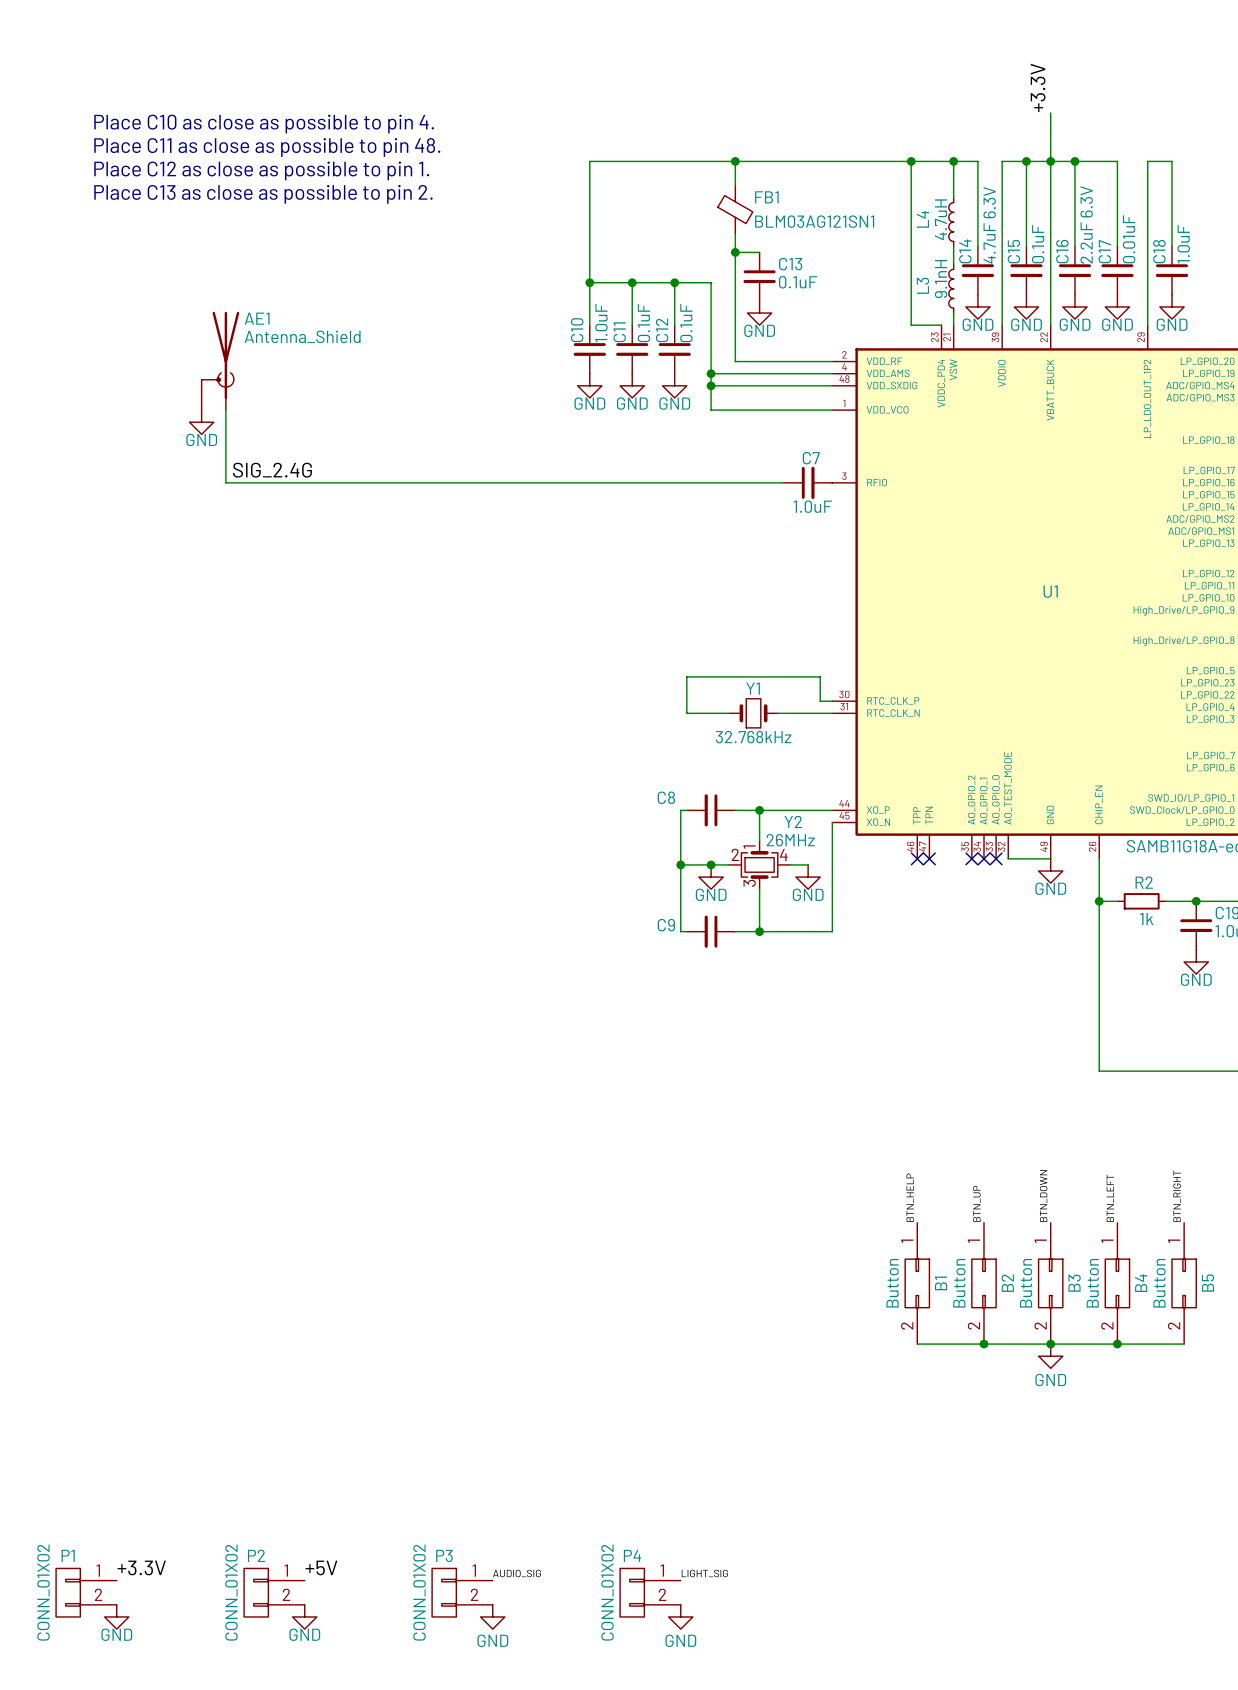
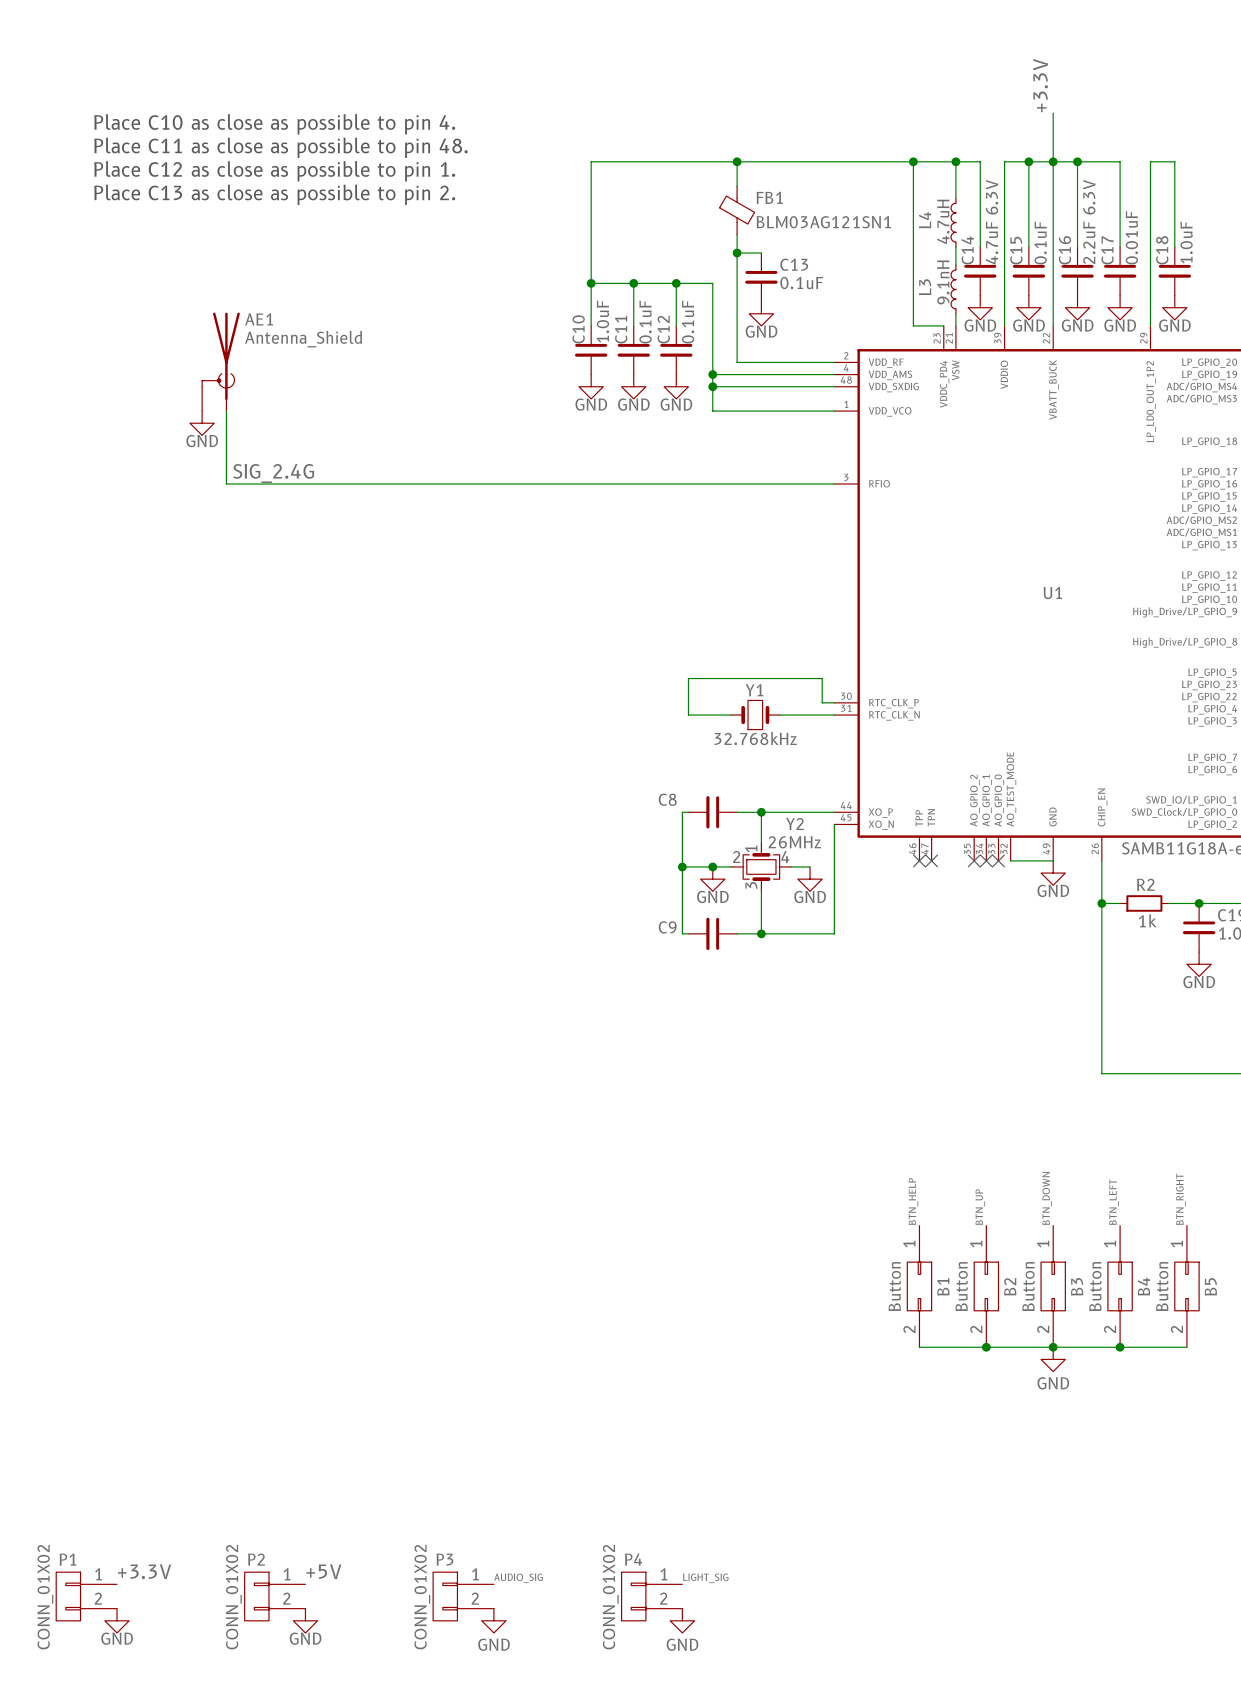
C7: 1.0uF (808, 482) -> none

